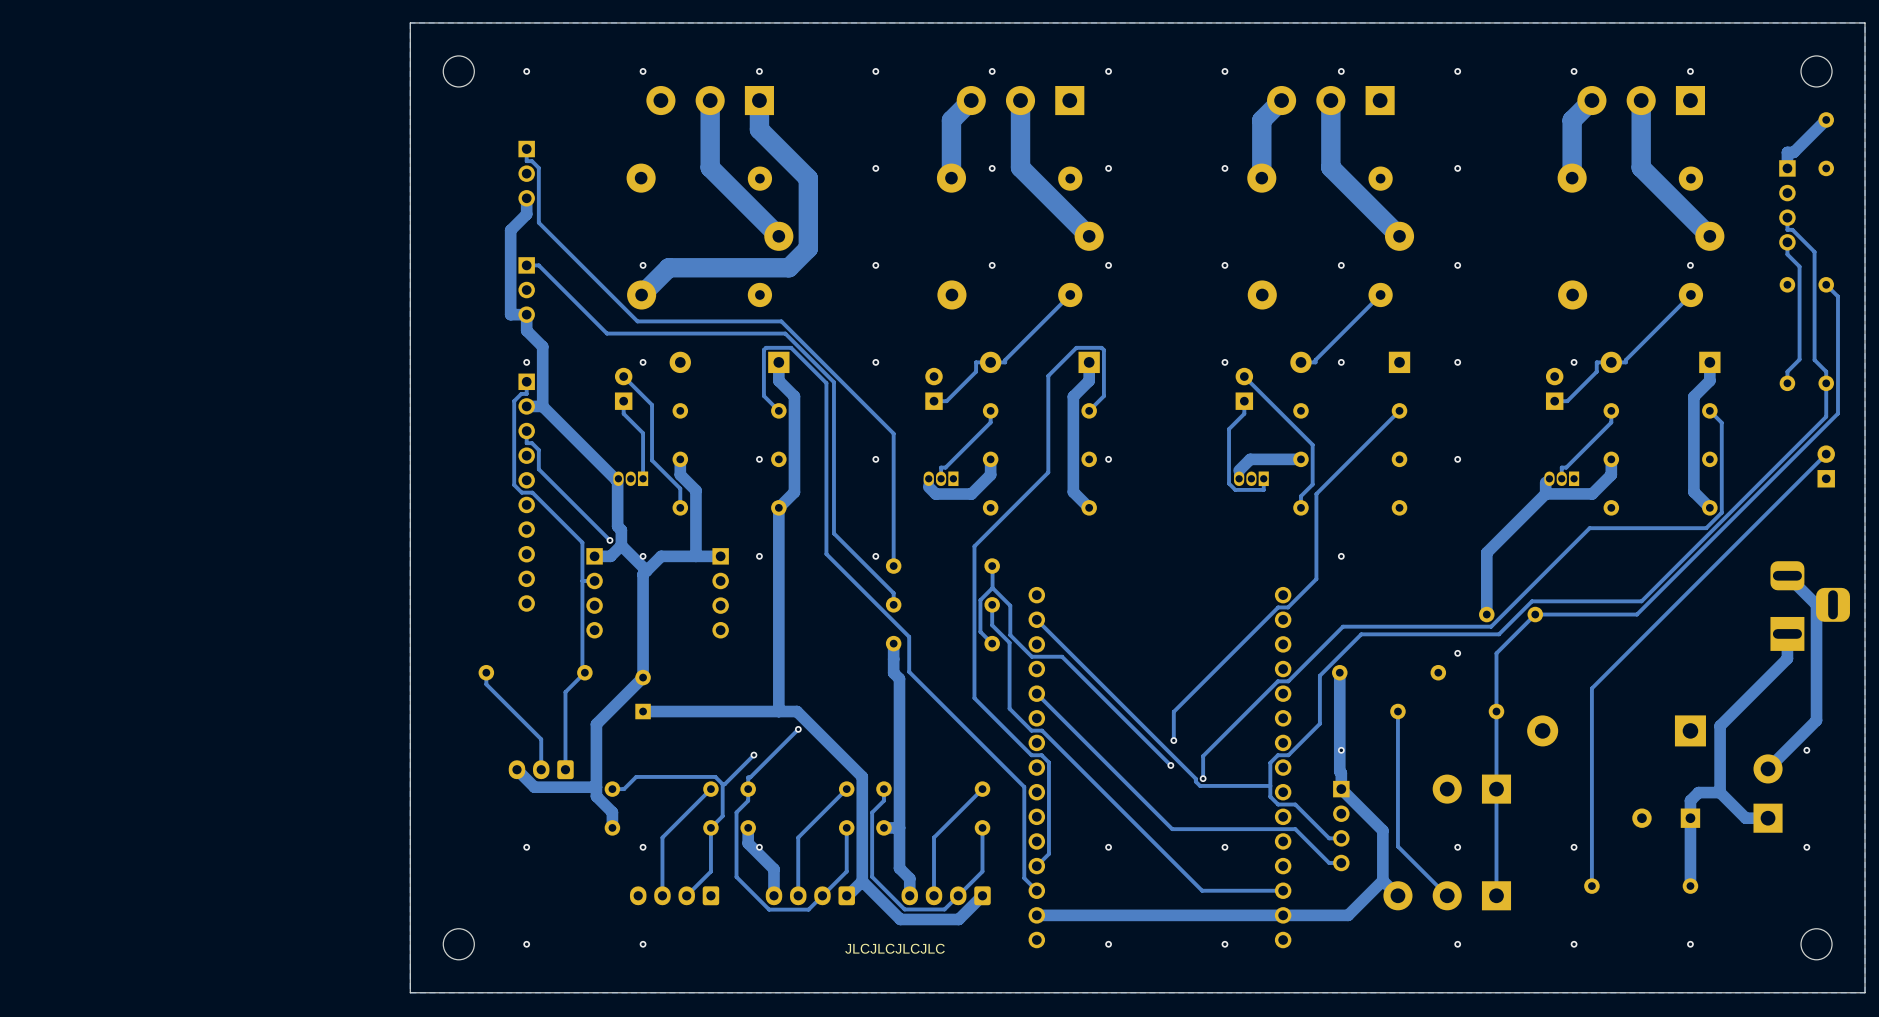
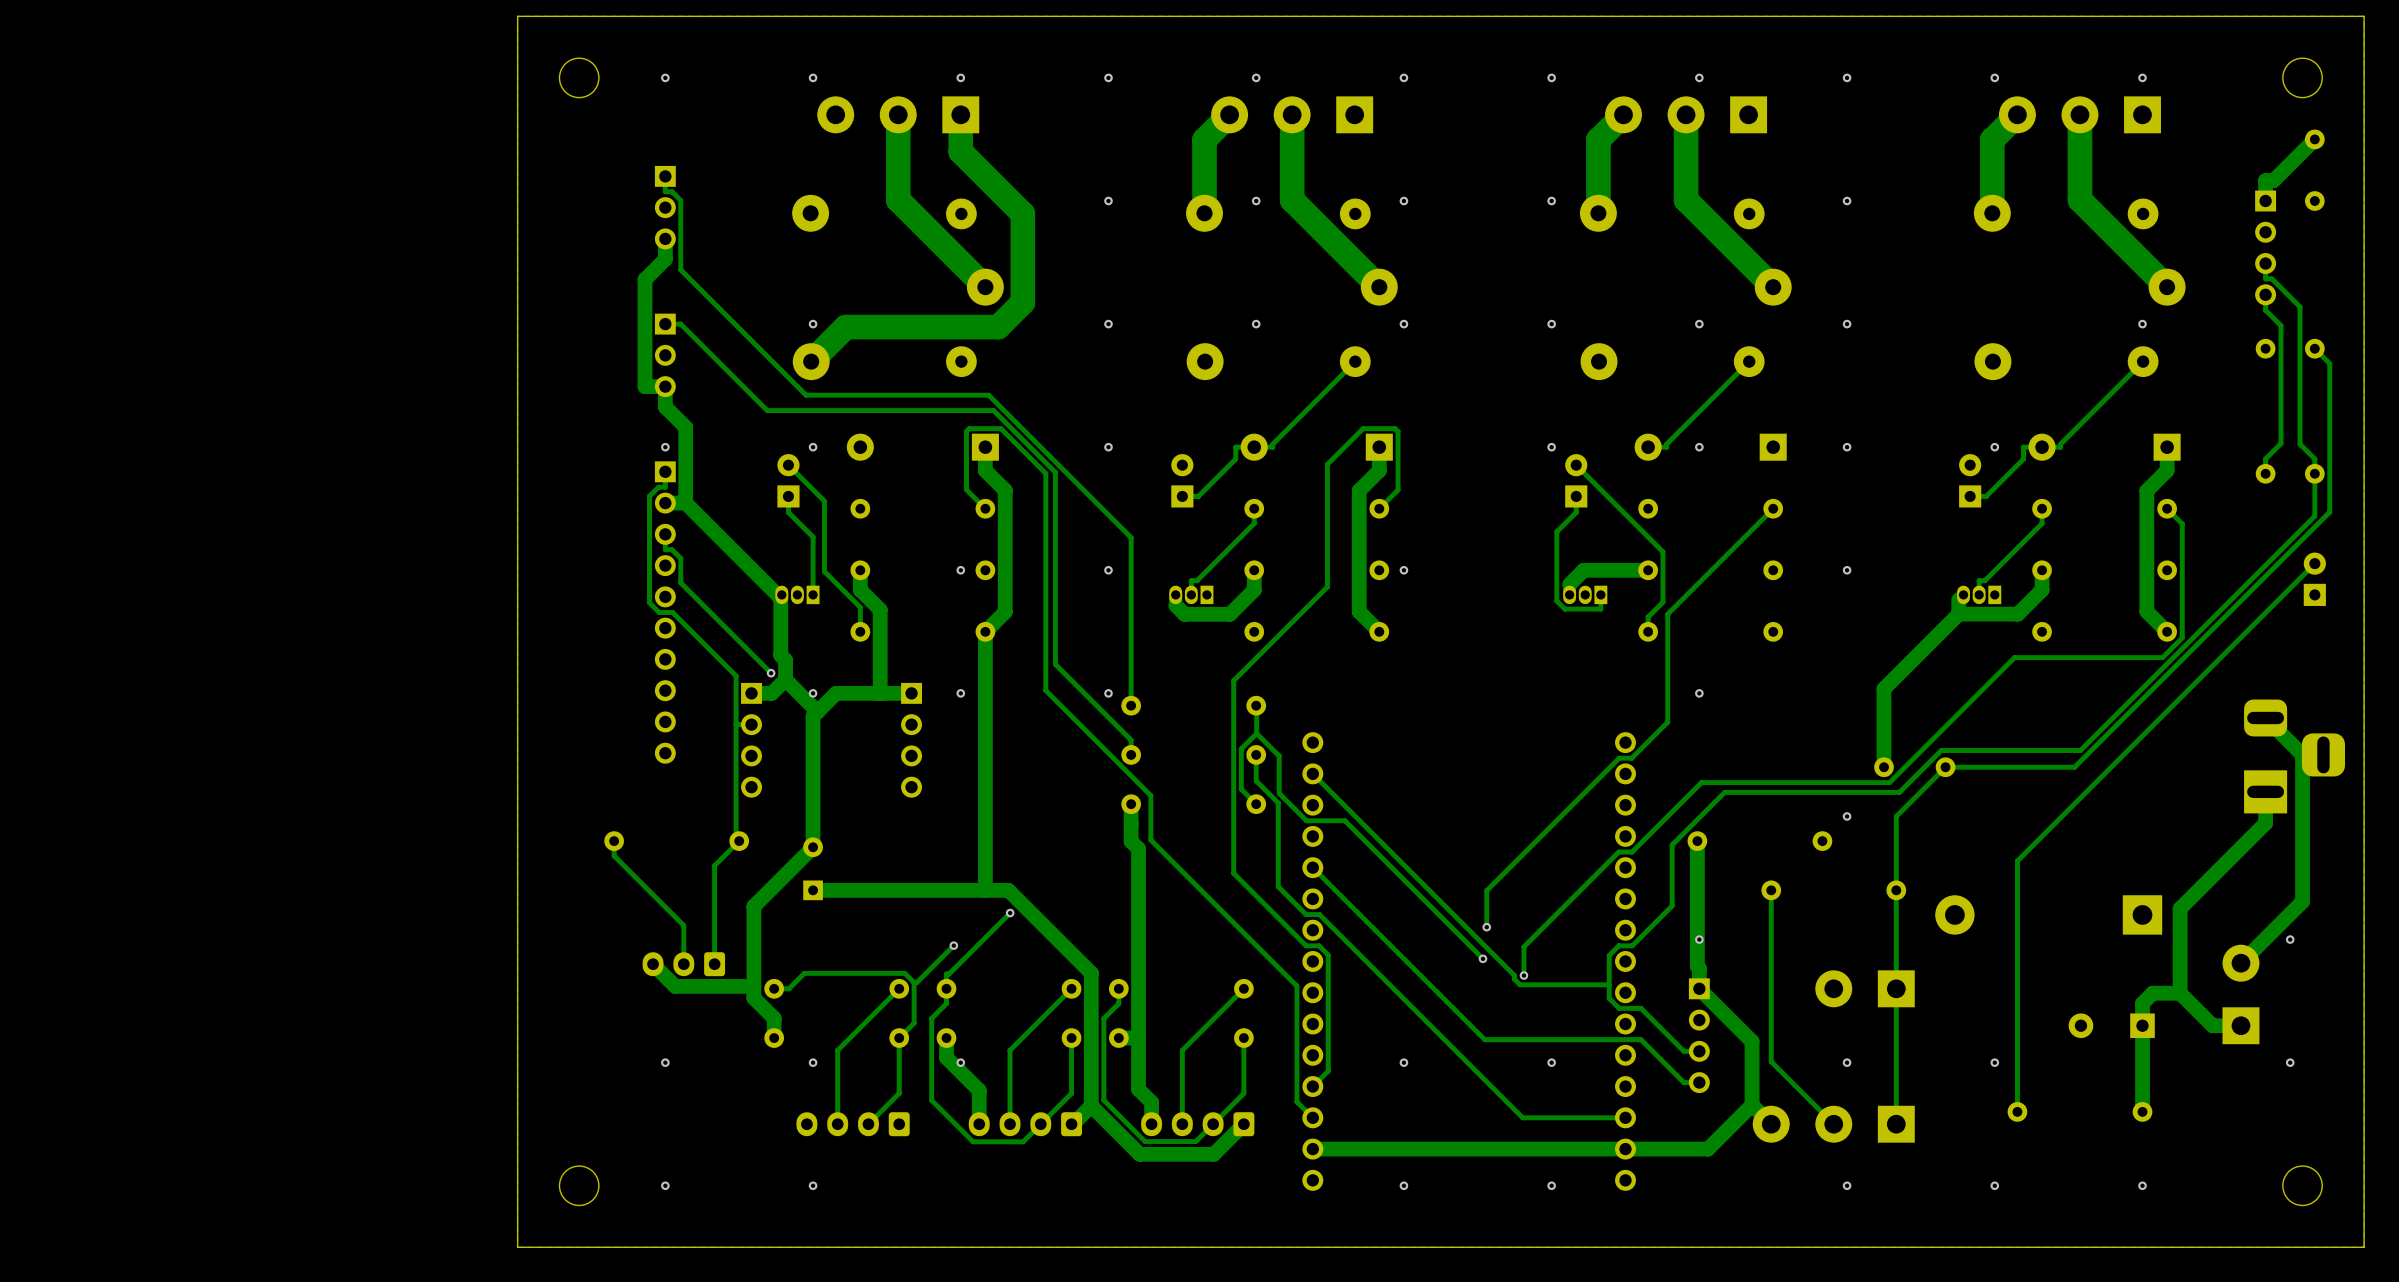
text: JLCJLCJLCJLC (895, 948) -> none

